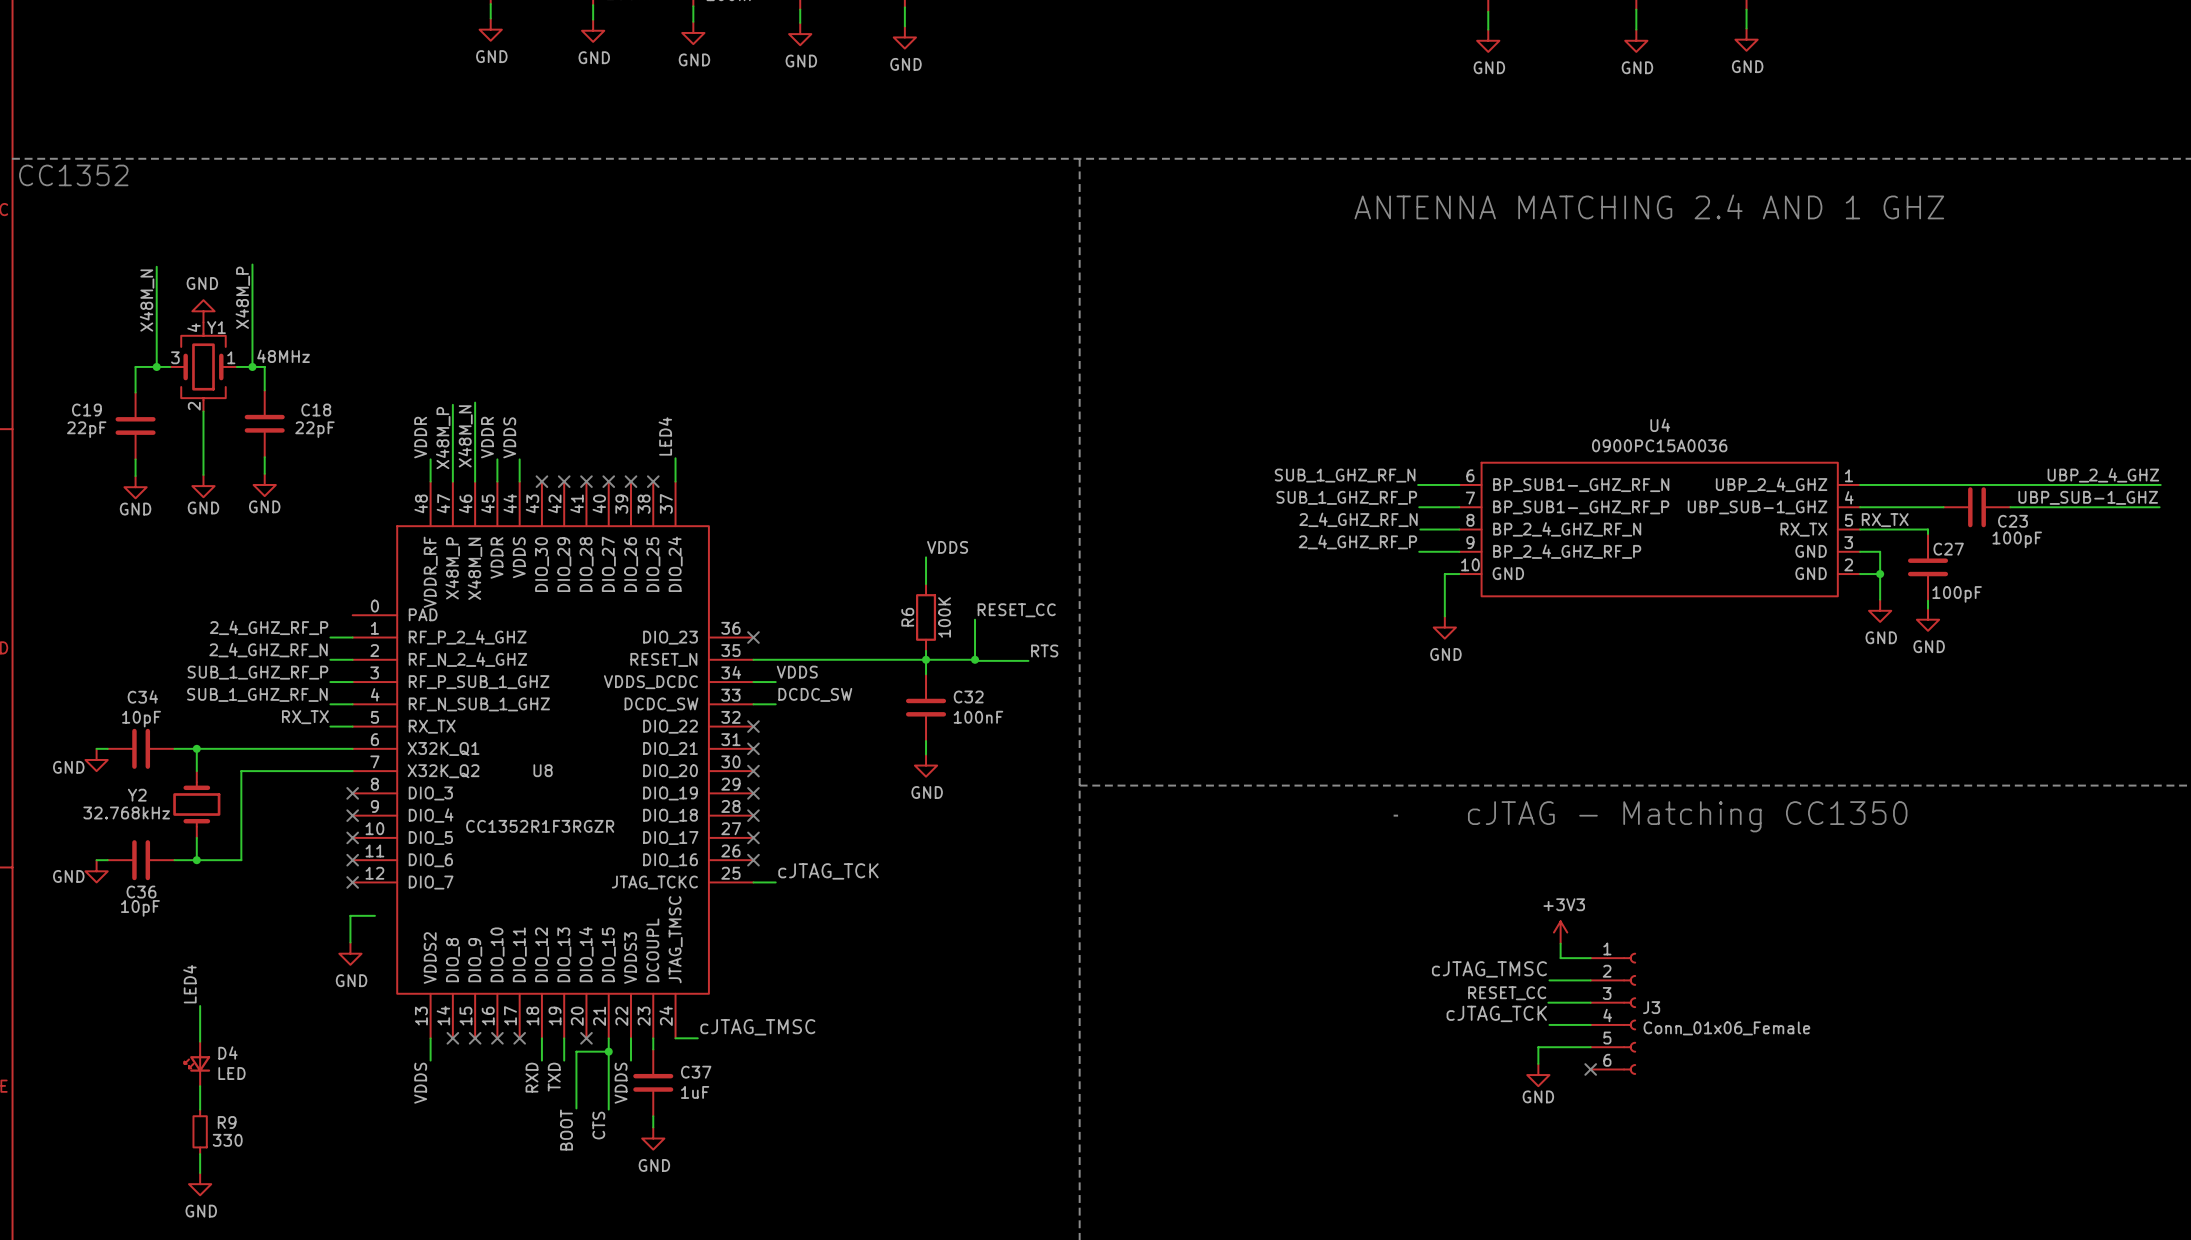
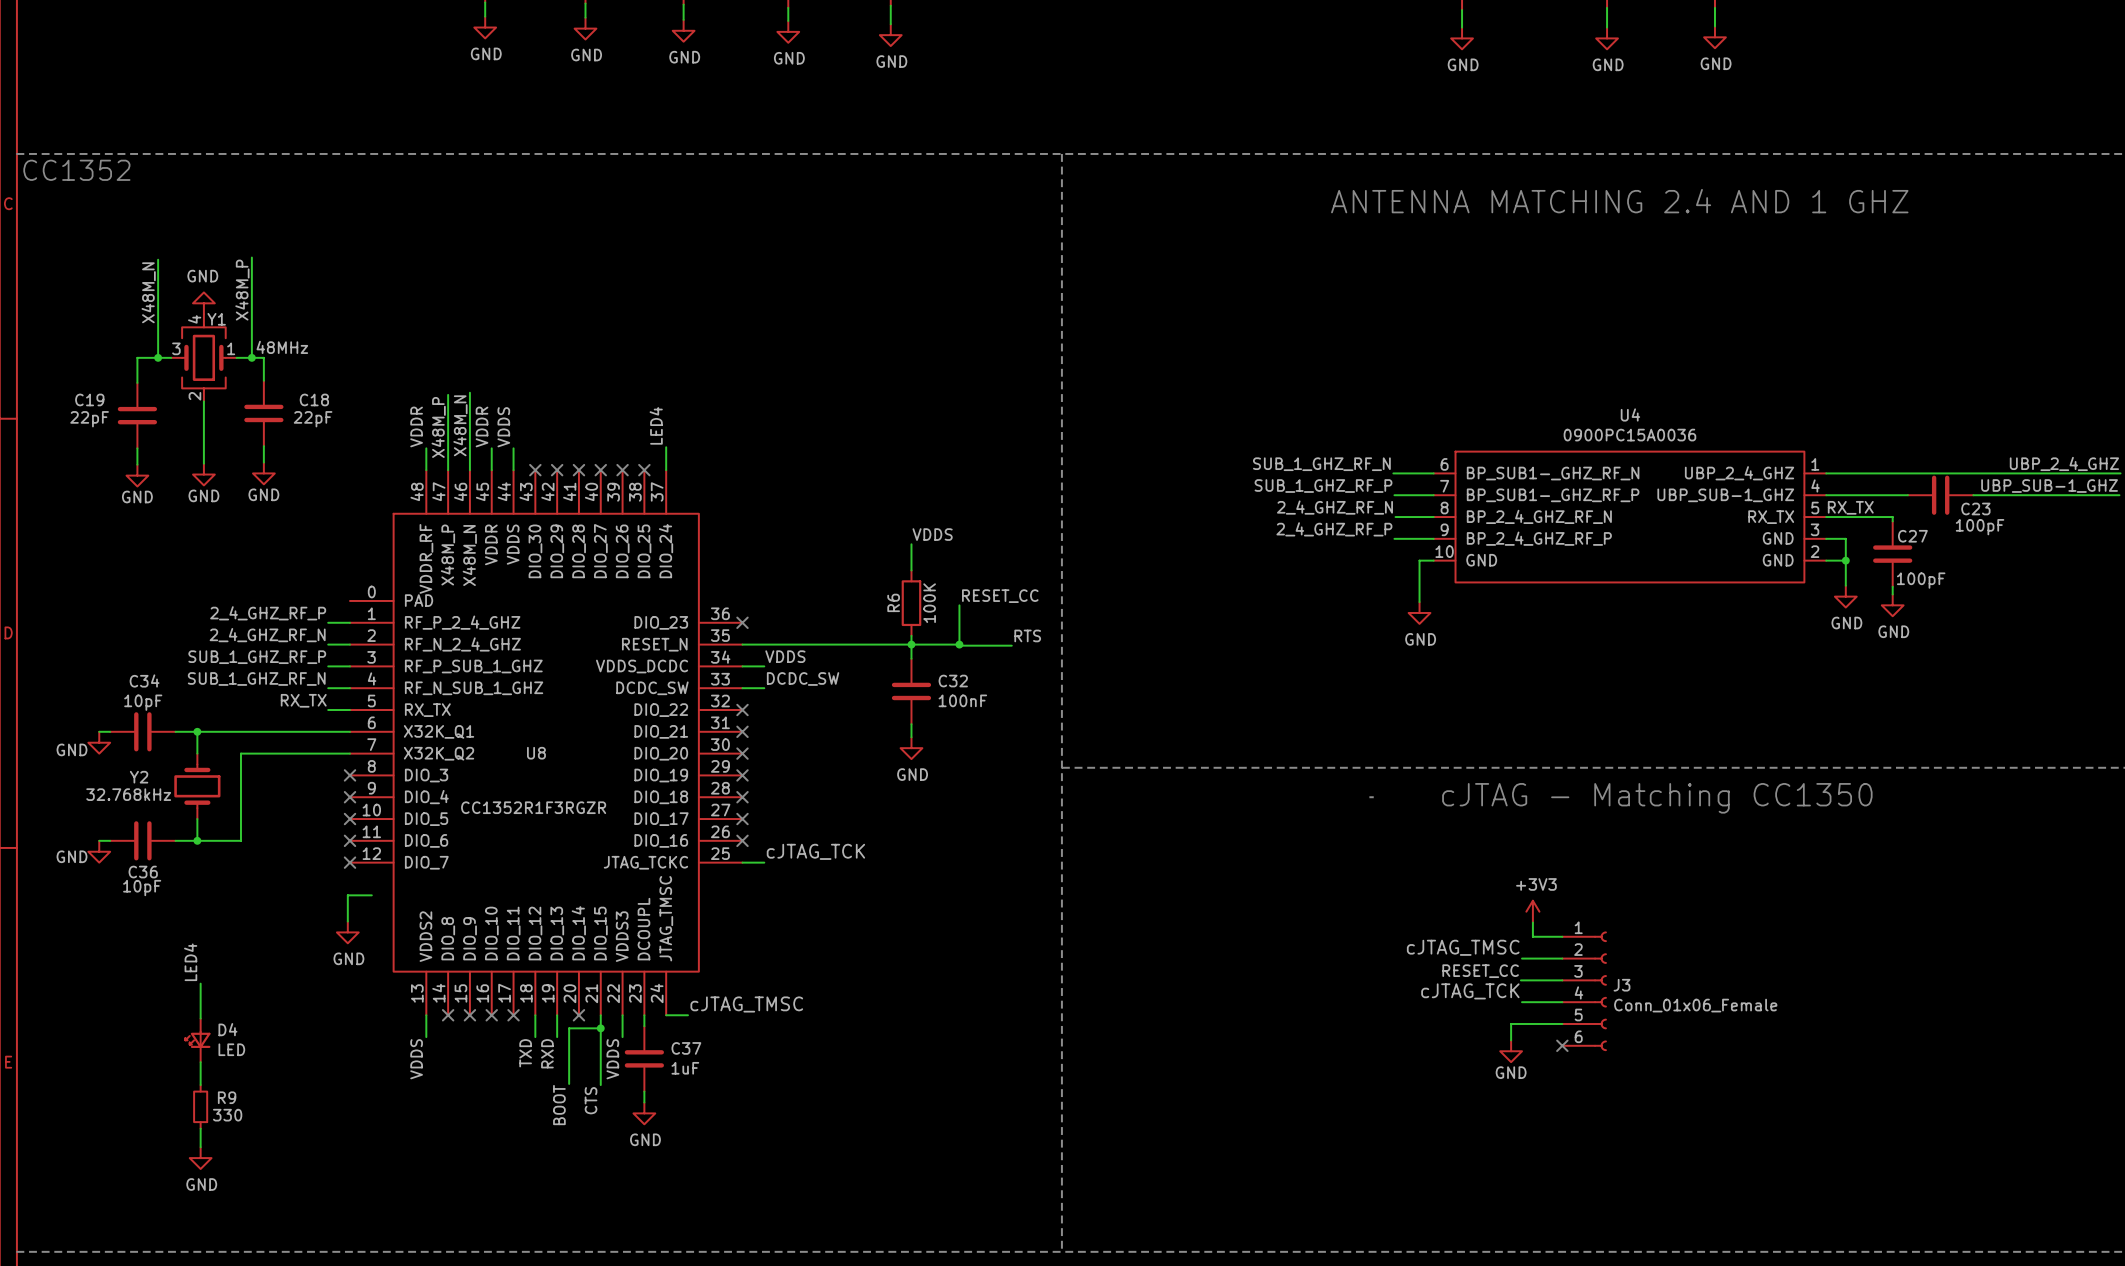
label: RXD (531, 1077) -> TXD (525, 1053)
label: TXD (554, 1077) -> RXD (547, 1053)

